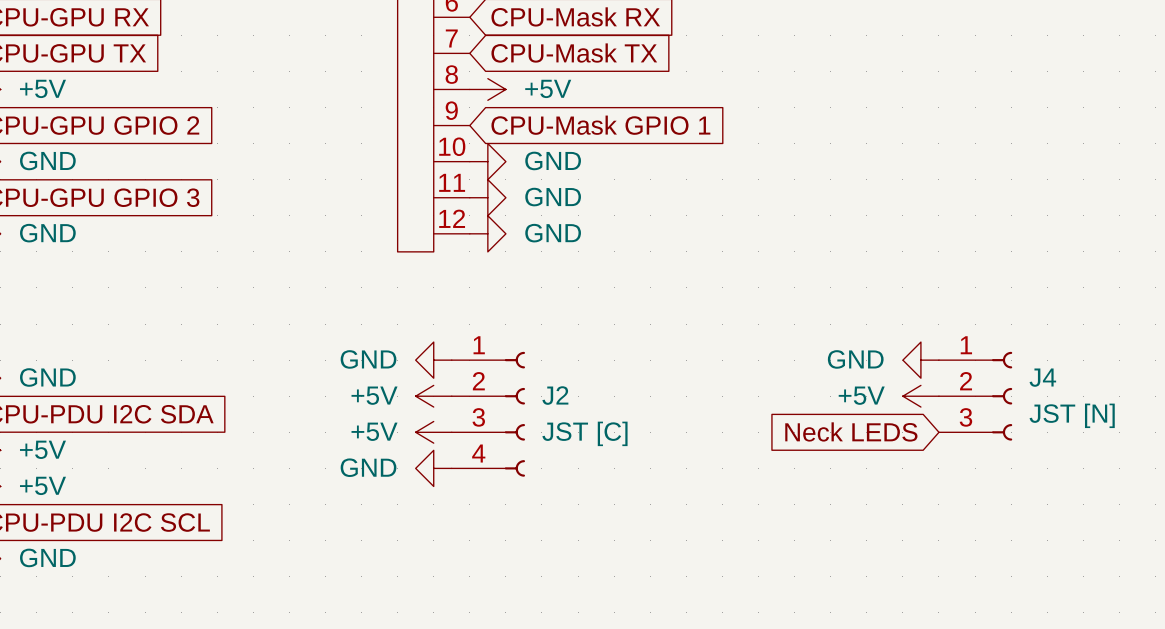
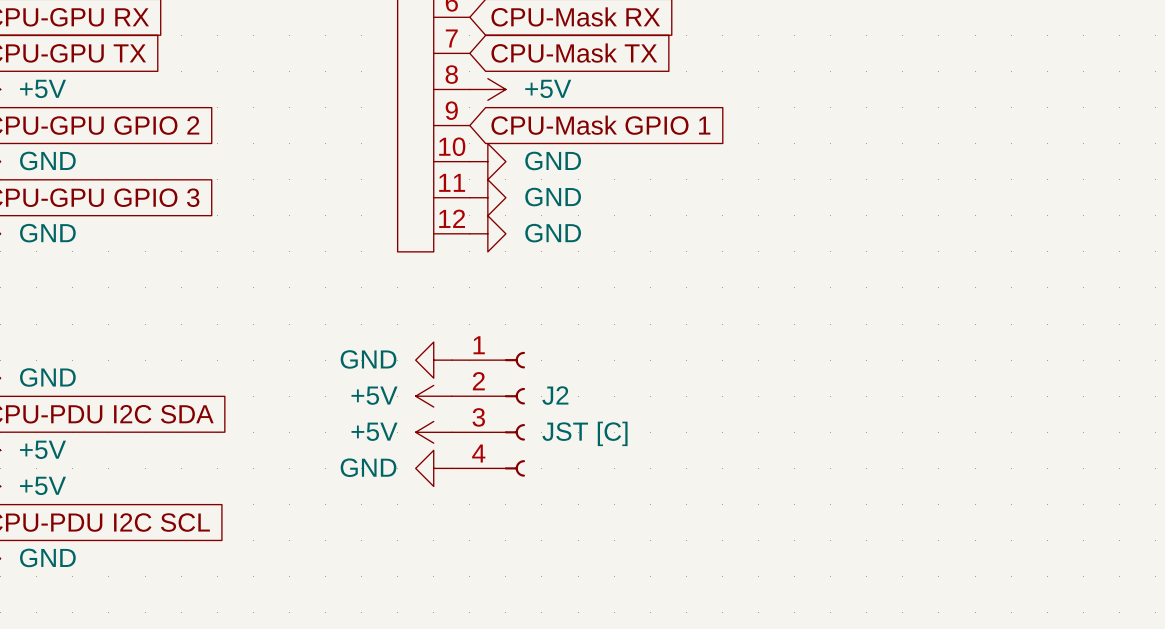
power symbol: GND (920, 360) -> none
power symbol: +5V (920, 396) -> none
J4: JST [N] (975, 396) -> none
global label: Neck LEDS (851, 431) -> none

